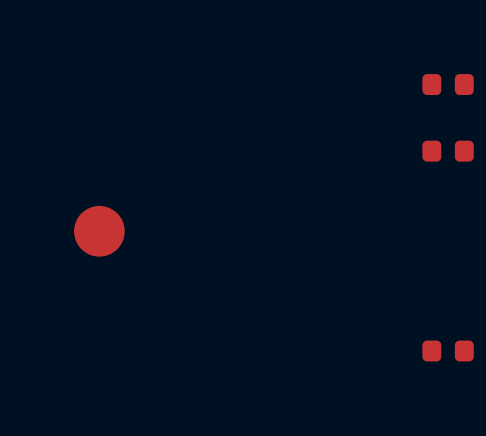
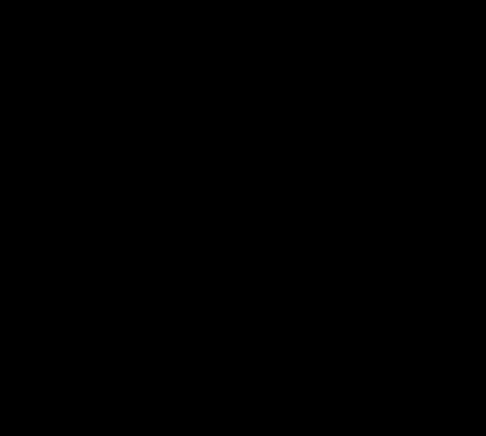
part: (448, 84) -> none
part: (448, 151) -> none
part: (99, 231) -> none
part: (448, 351) -> none

